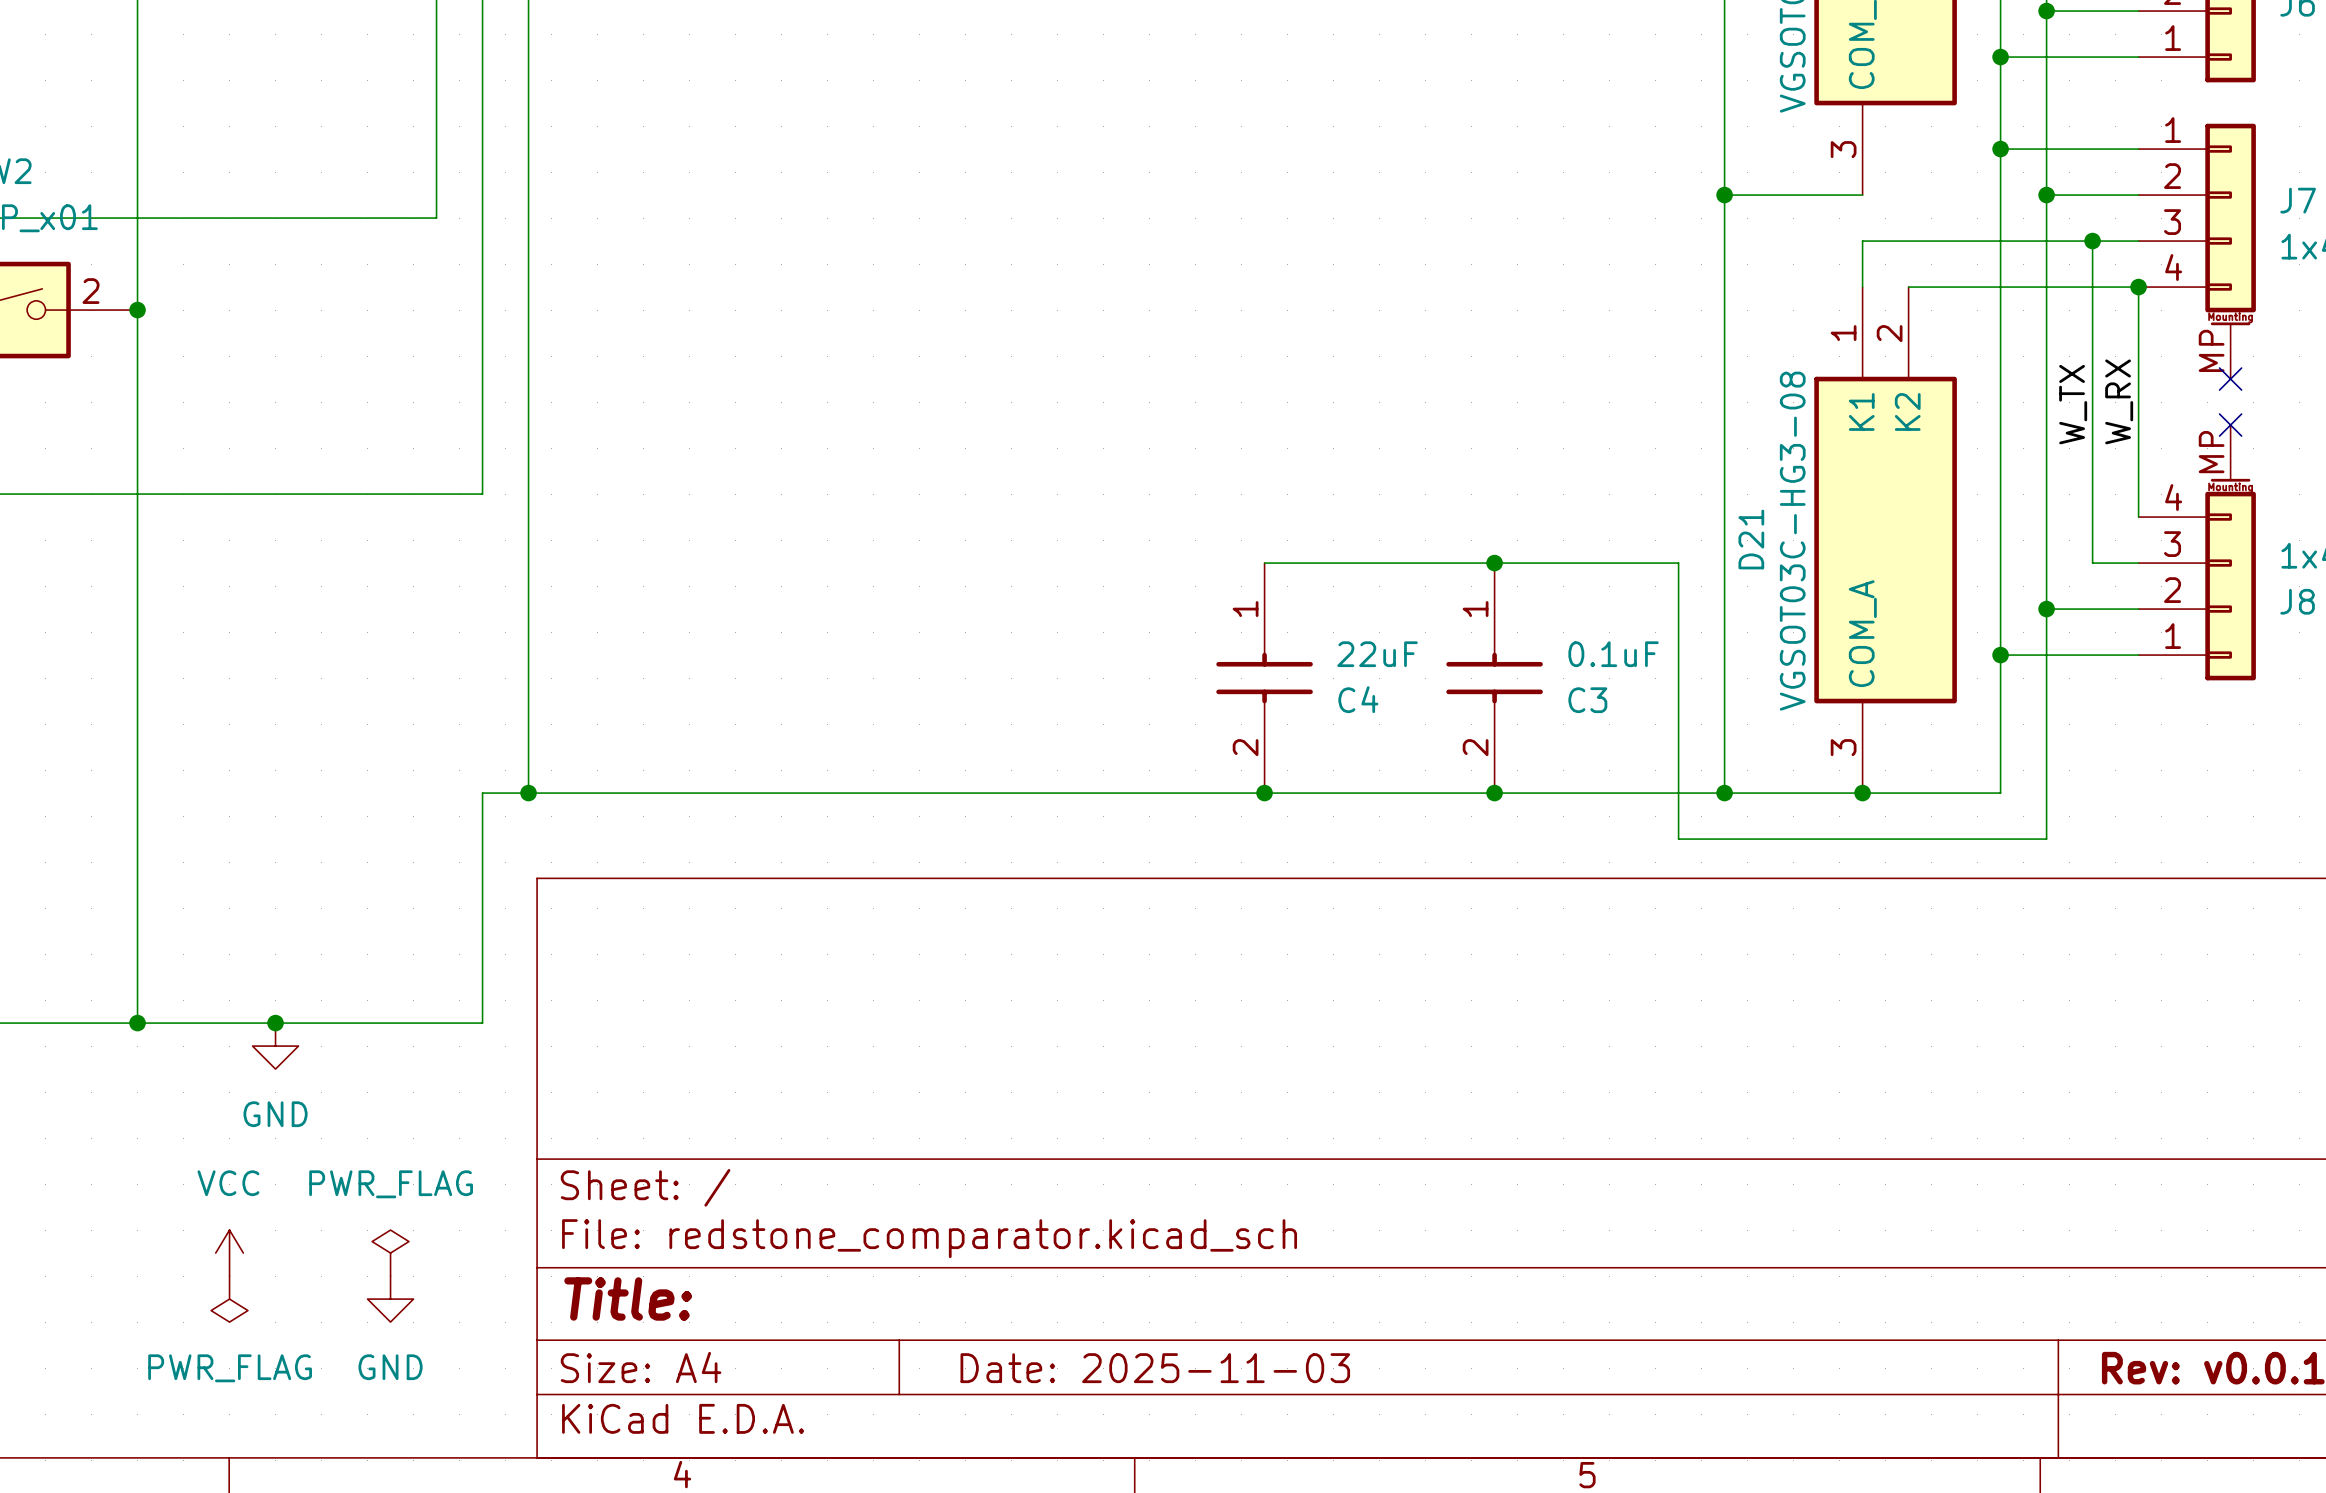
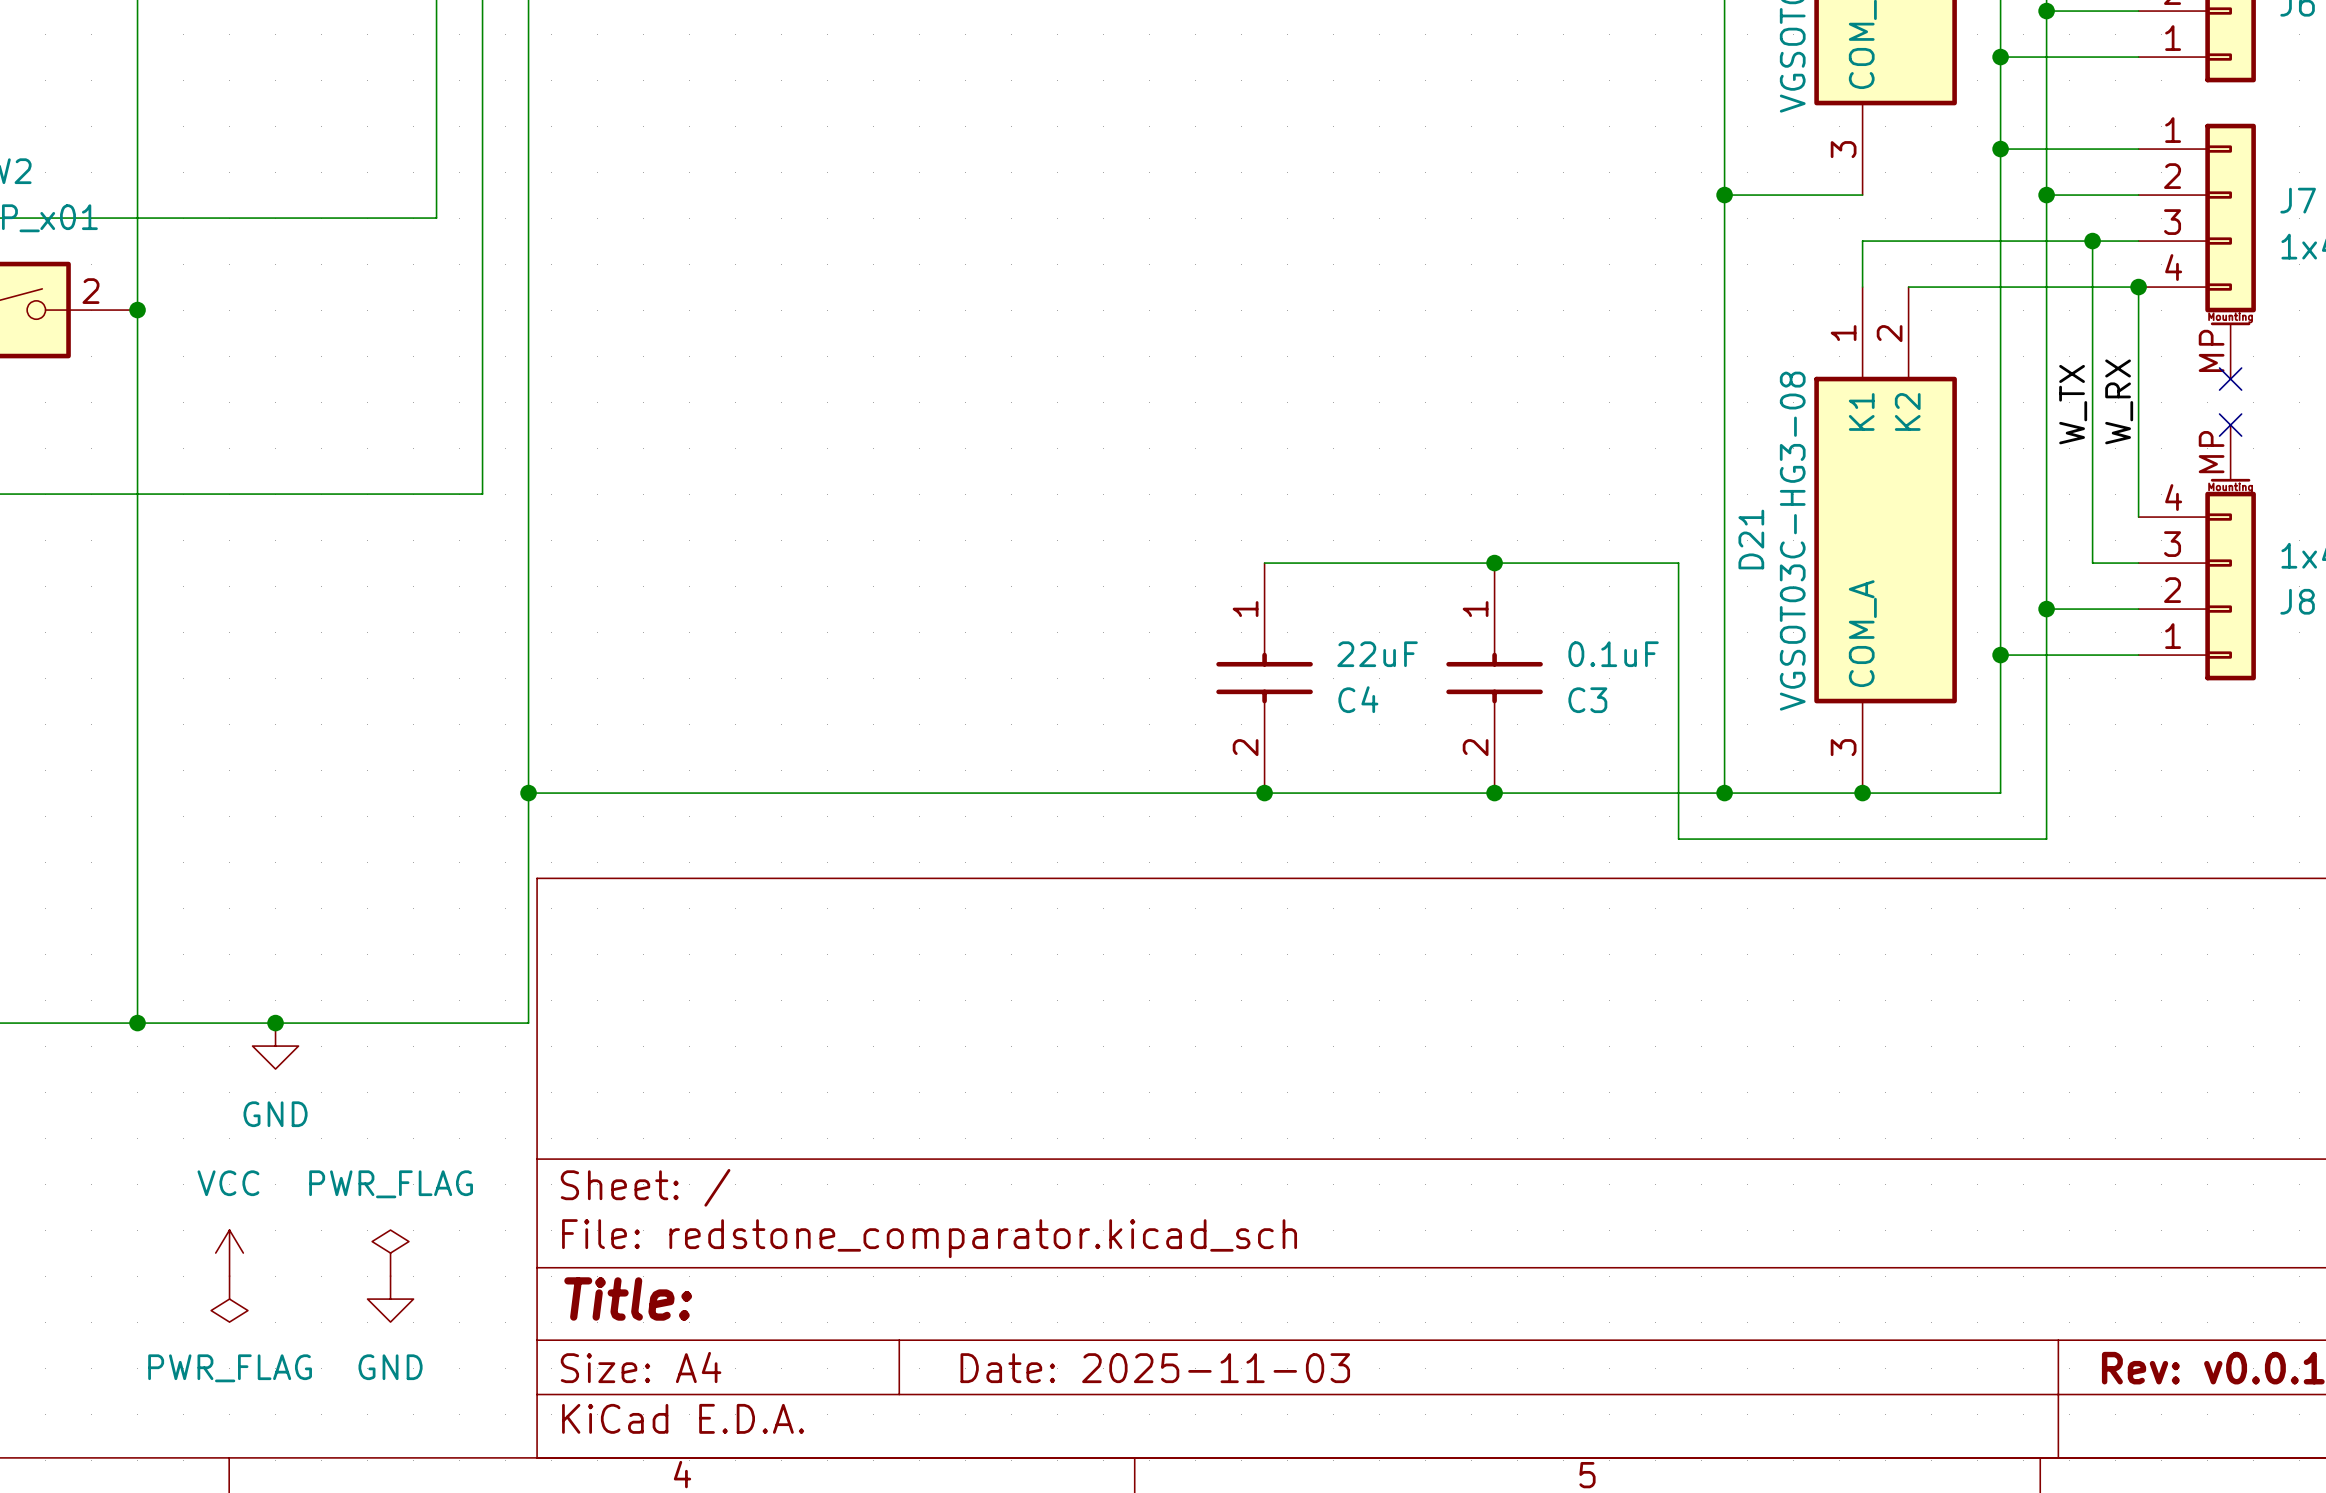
wire: (528, 793) (482, 793) (482, 1023) -> (528, 793) (528, 1023) (482, 1023)

